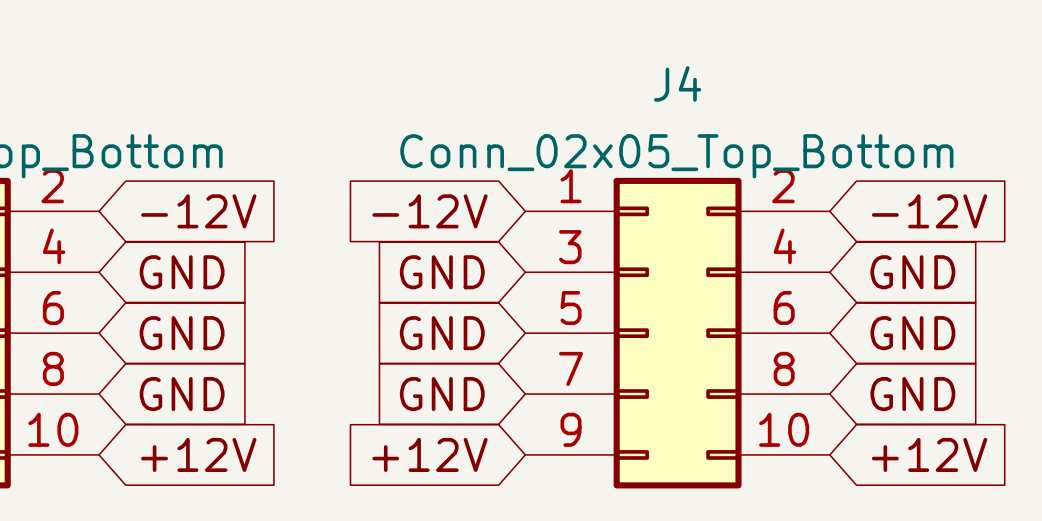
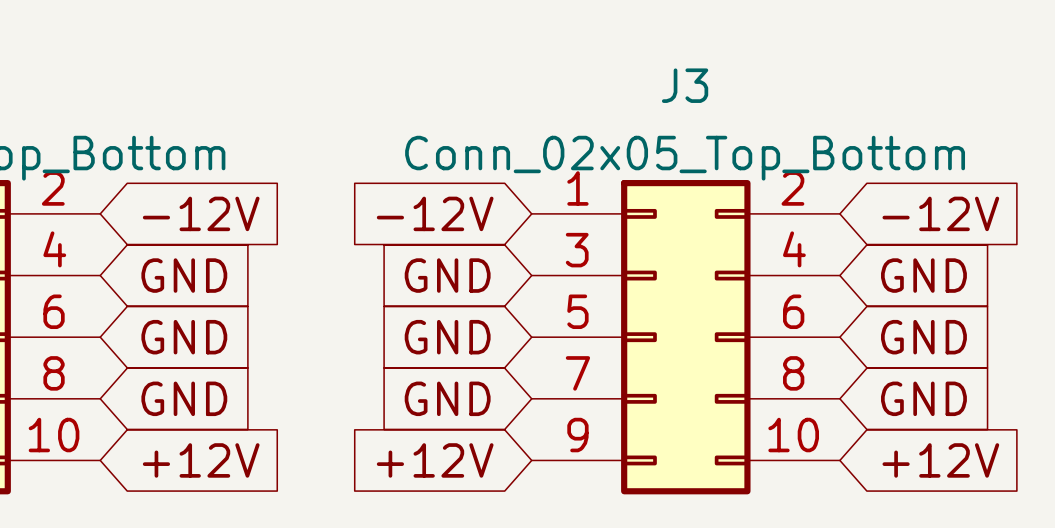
J4 name: J4 (677, 83) -> J3 (685, 85)

